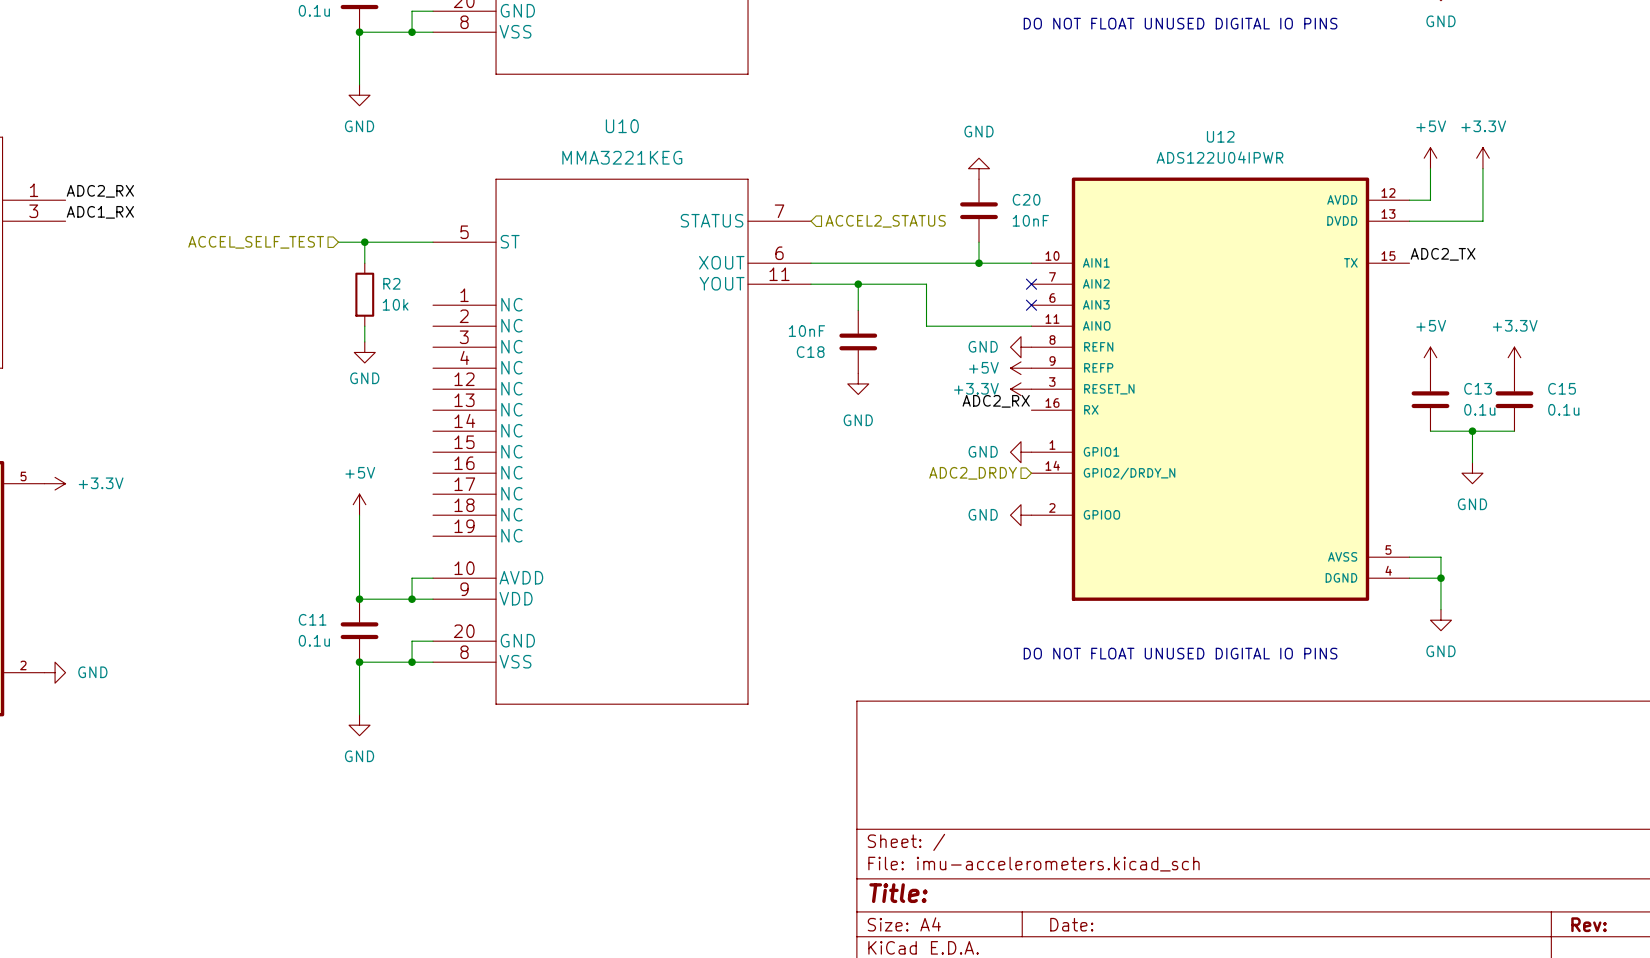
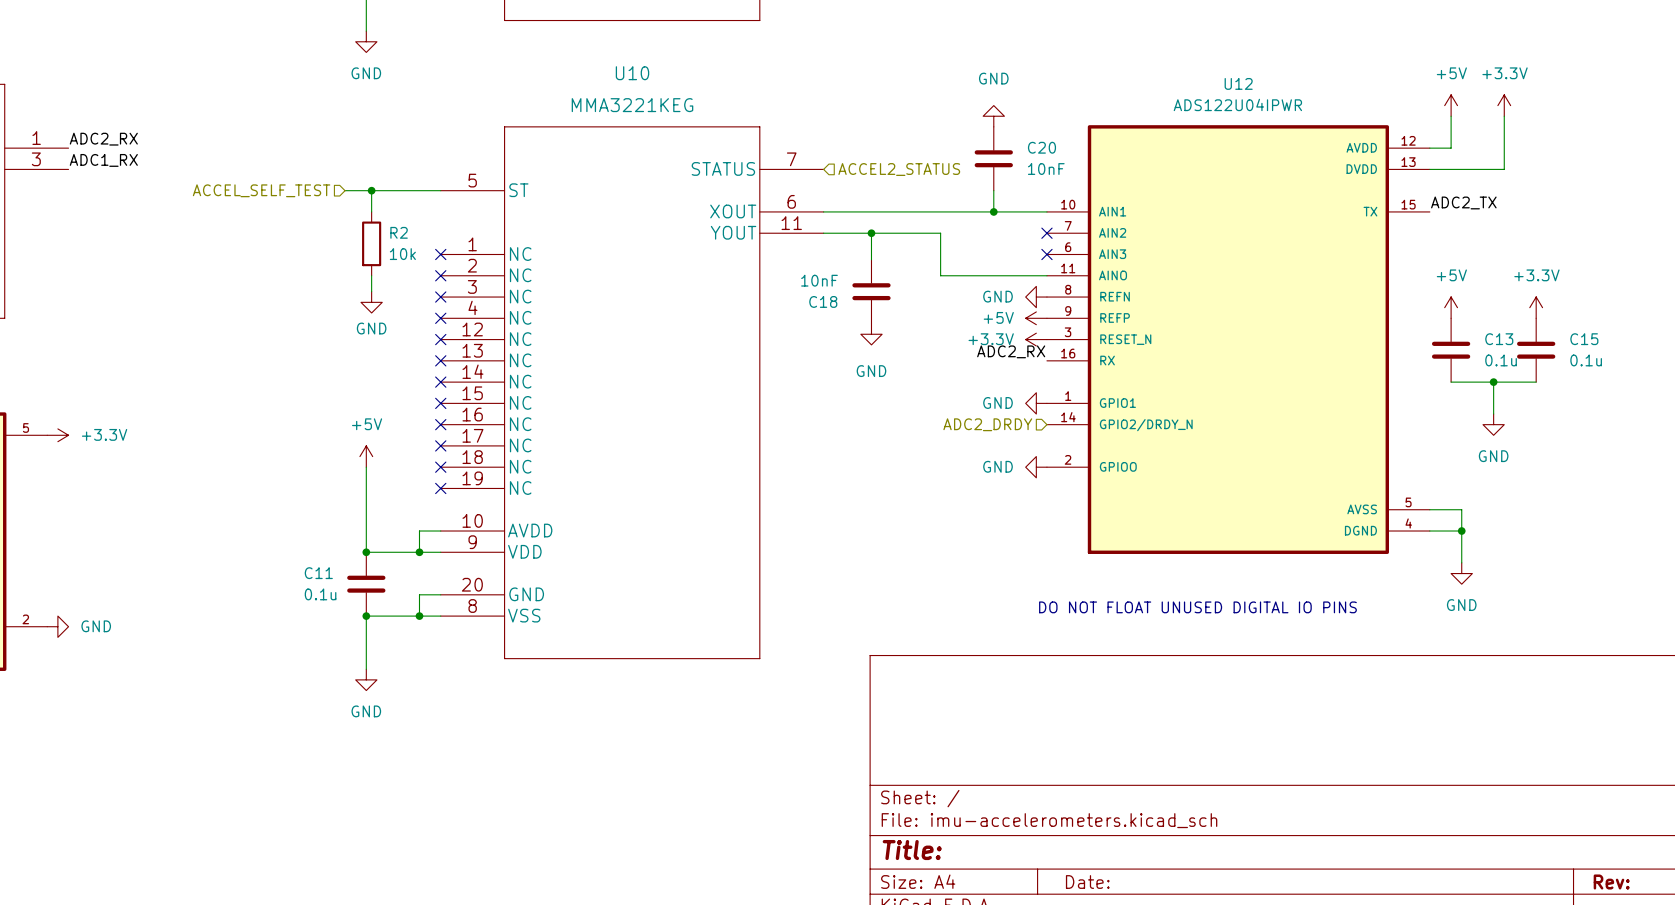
no-connect mark: none -> (440, 254)
no-connect mark: none -> (440, 275)
no-connect mark: none -> (440, 297)
no-connect mark: none -> (440, 318)
no-connect mark: none -> (440, 339)
no-connect mark: none -> (440, 360)
no-connect mark: none -> (440, 382)
no-connect mark: none -> (440, 403)
no-connect mark: none -> (440, 424)
no-connect mark: none -> (440, 445)
no-connect mark: none -> (440, 467)
no-connect mark: none -> (440, 488)

